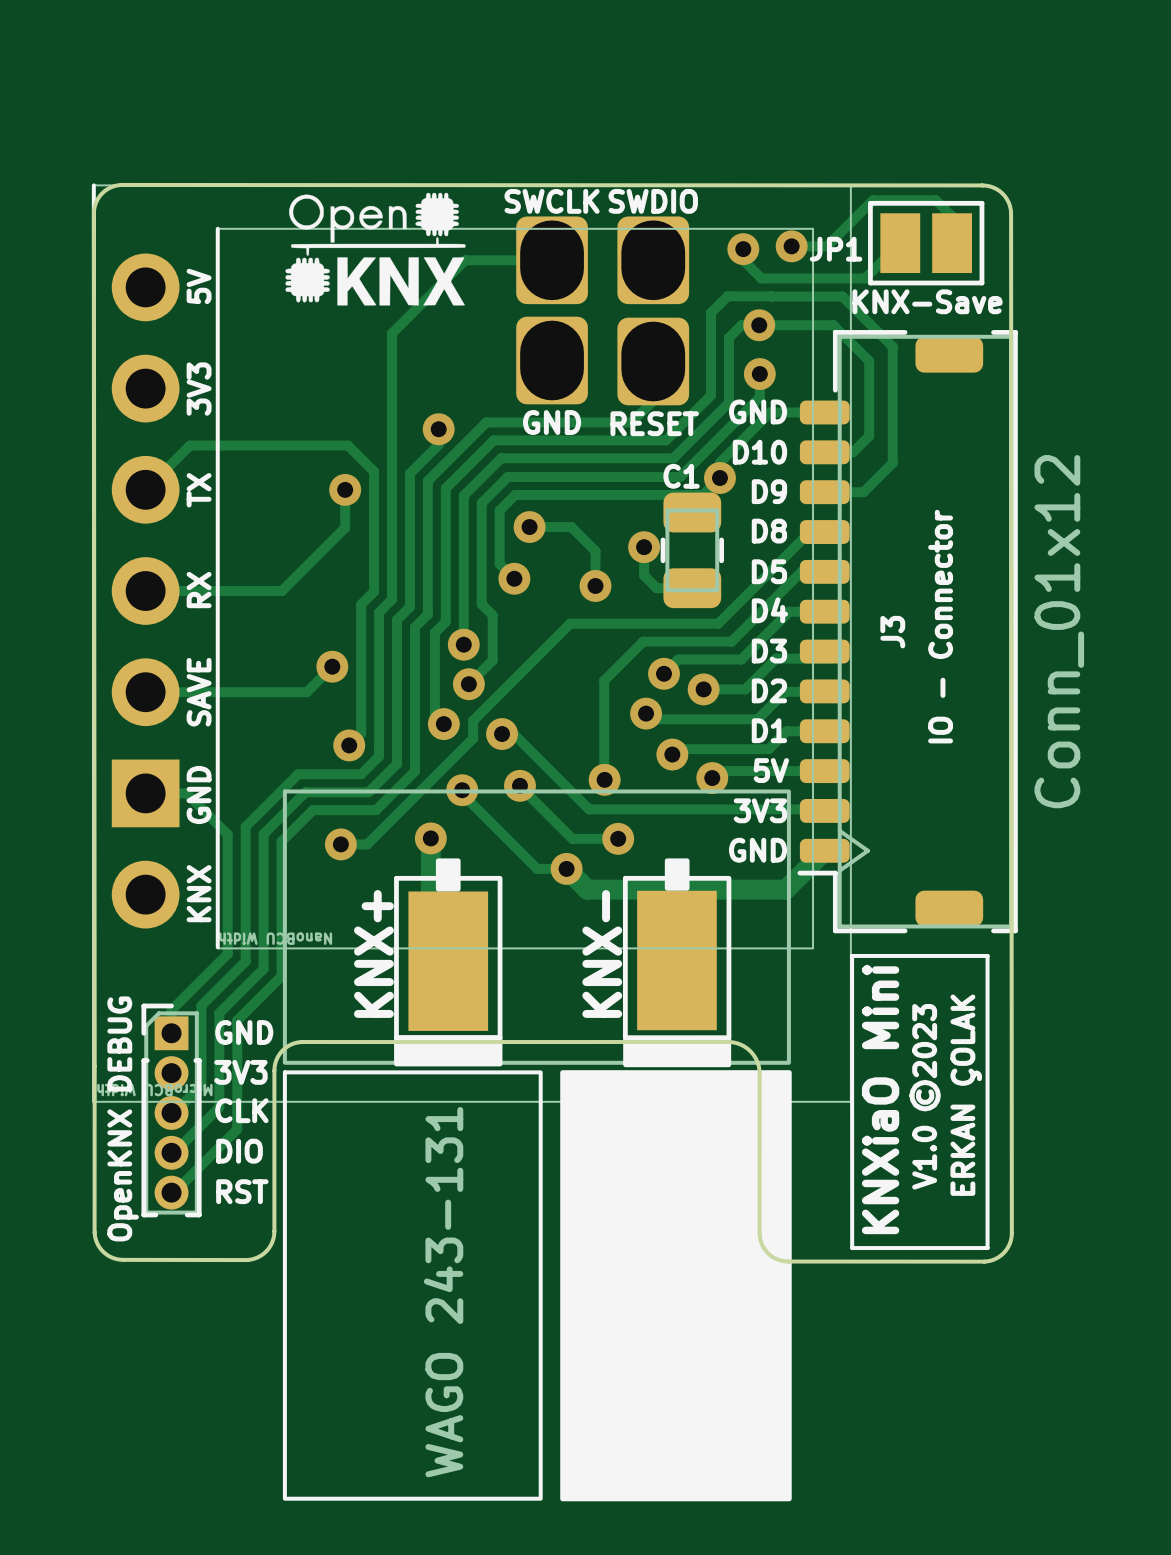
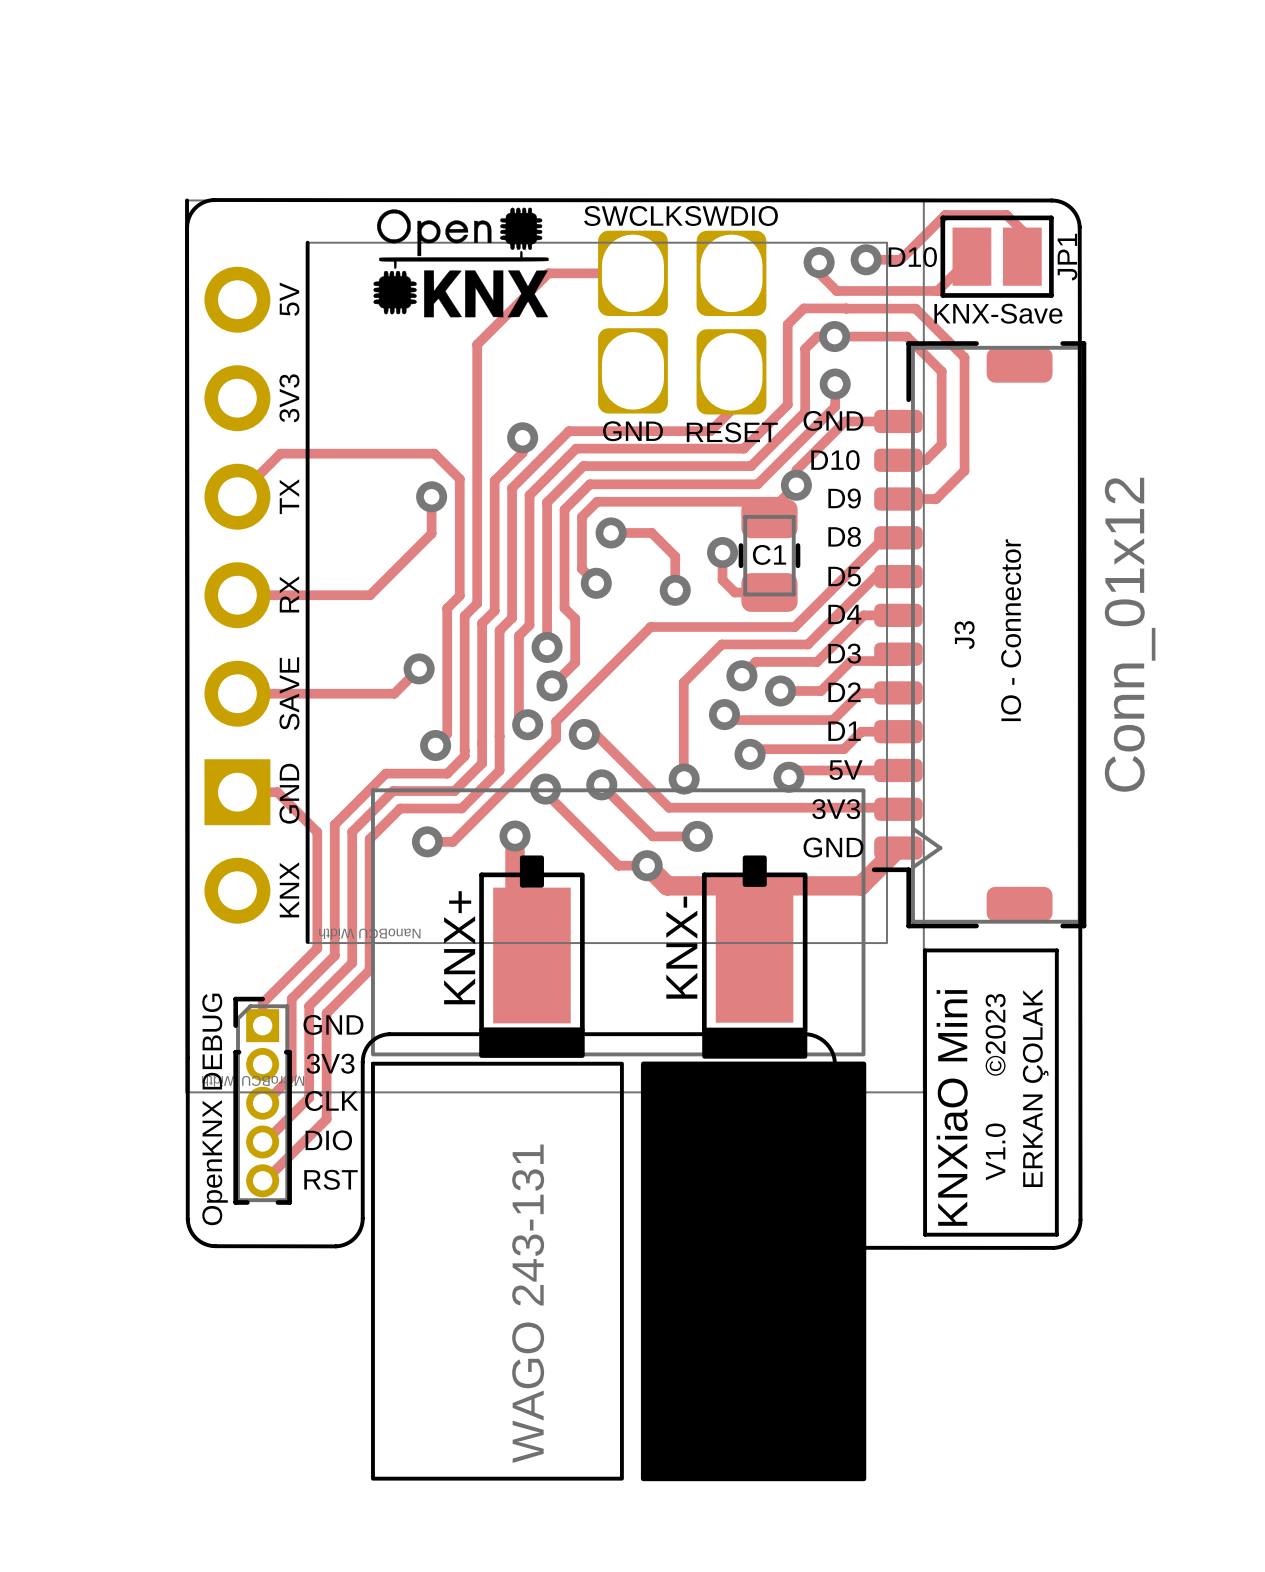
JP1 text: none -> D10 (912, 257)
JP1 name rotation: 0° (836, 249) -> 90° counterclockwise (1067, 257)
JP1 name position: JP1 (836, 249) -> JP1 (1067, 257)
C1 name position: C1 (681, 476) -> C1 (769, 554)

